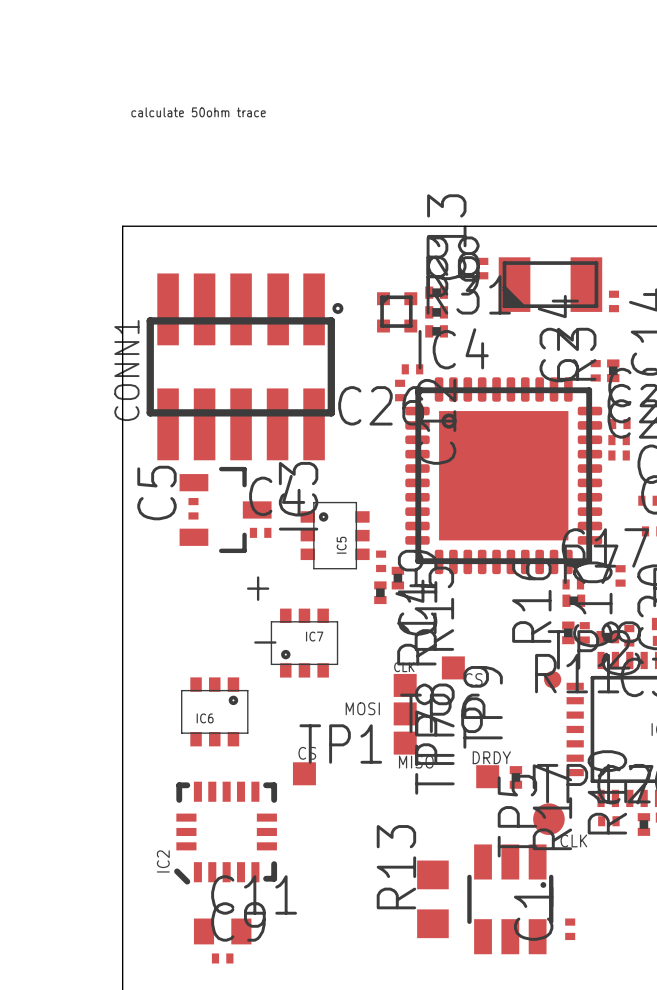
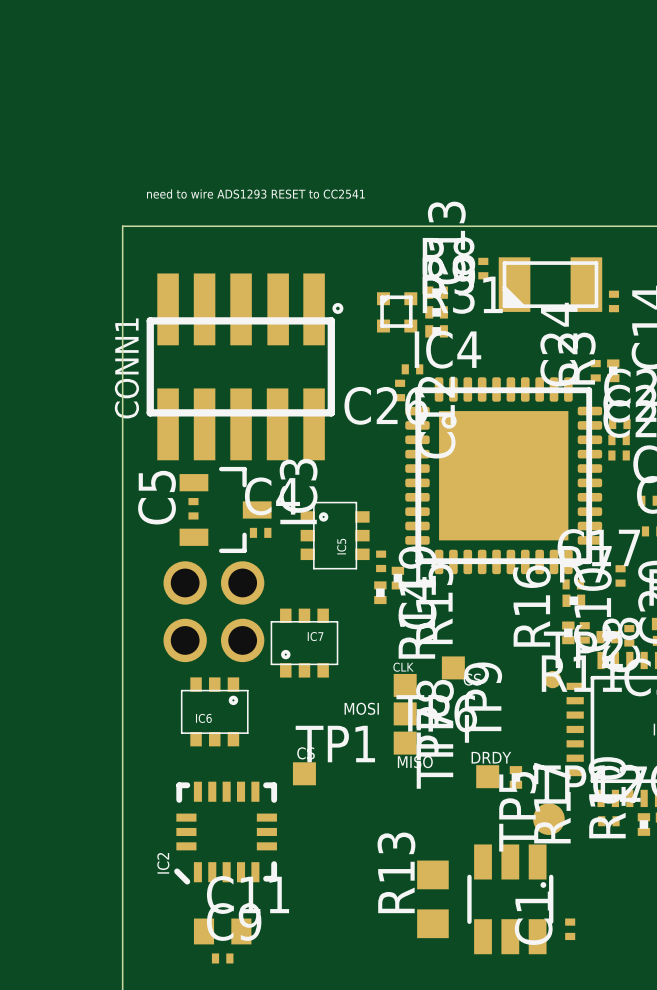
text: calculate 50ohm trace (198, 112) -> none
text: none -> need to wire ADS1293 RESET to CC2541 (255, 194)
text: + (258, 588) -> none
part: none -> (213, 611)
text: - (265, 642) -> none
text: CLK (573, 840) -> none

